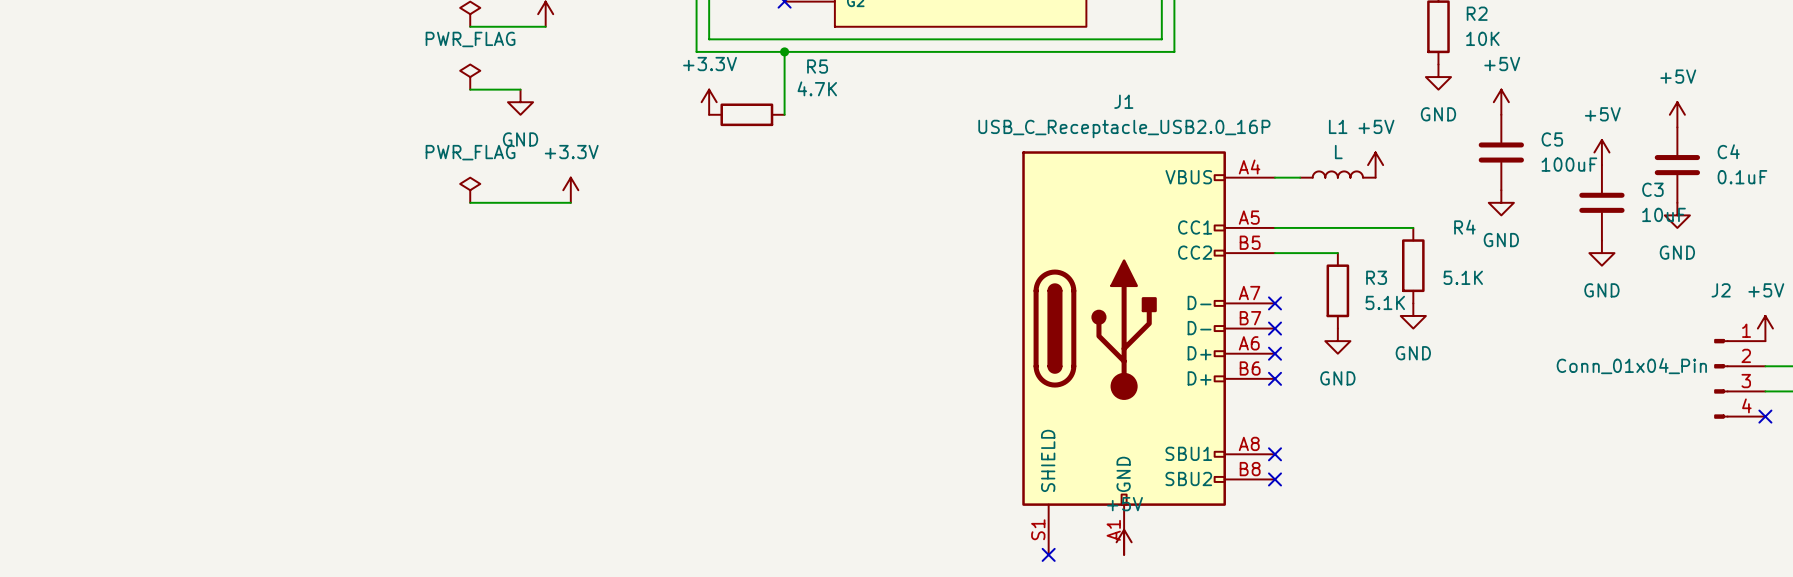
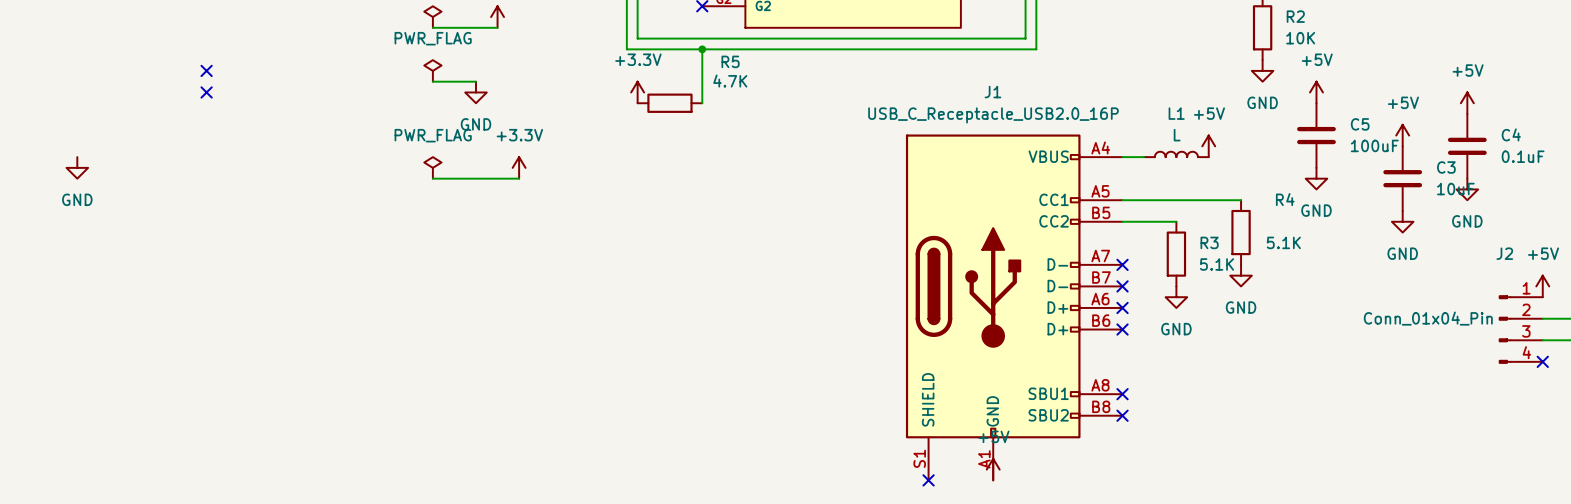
no-connect mark: none -> (206, 70)
no-connect mark: none -> (206, 92)
power symbol: none -> GND (77, 167)

